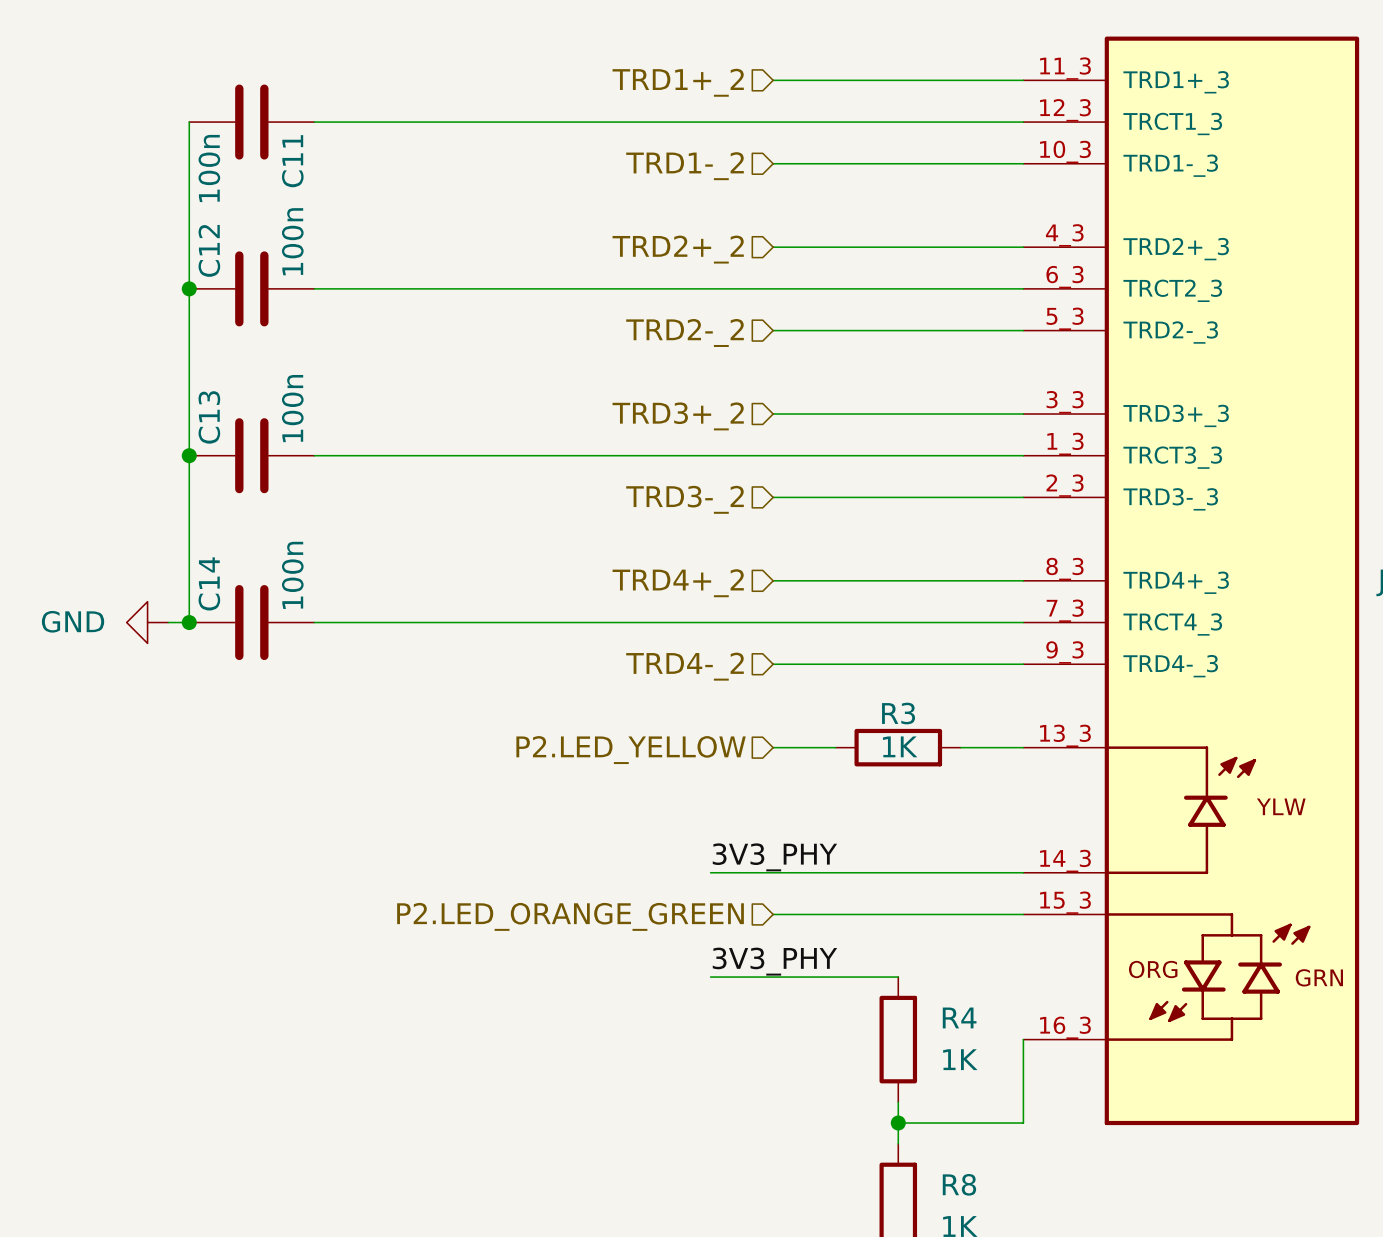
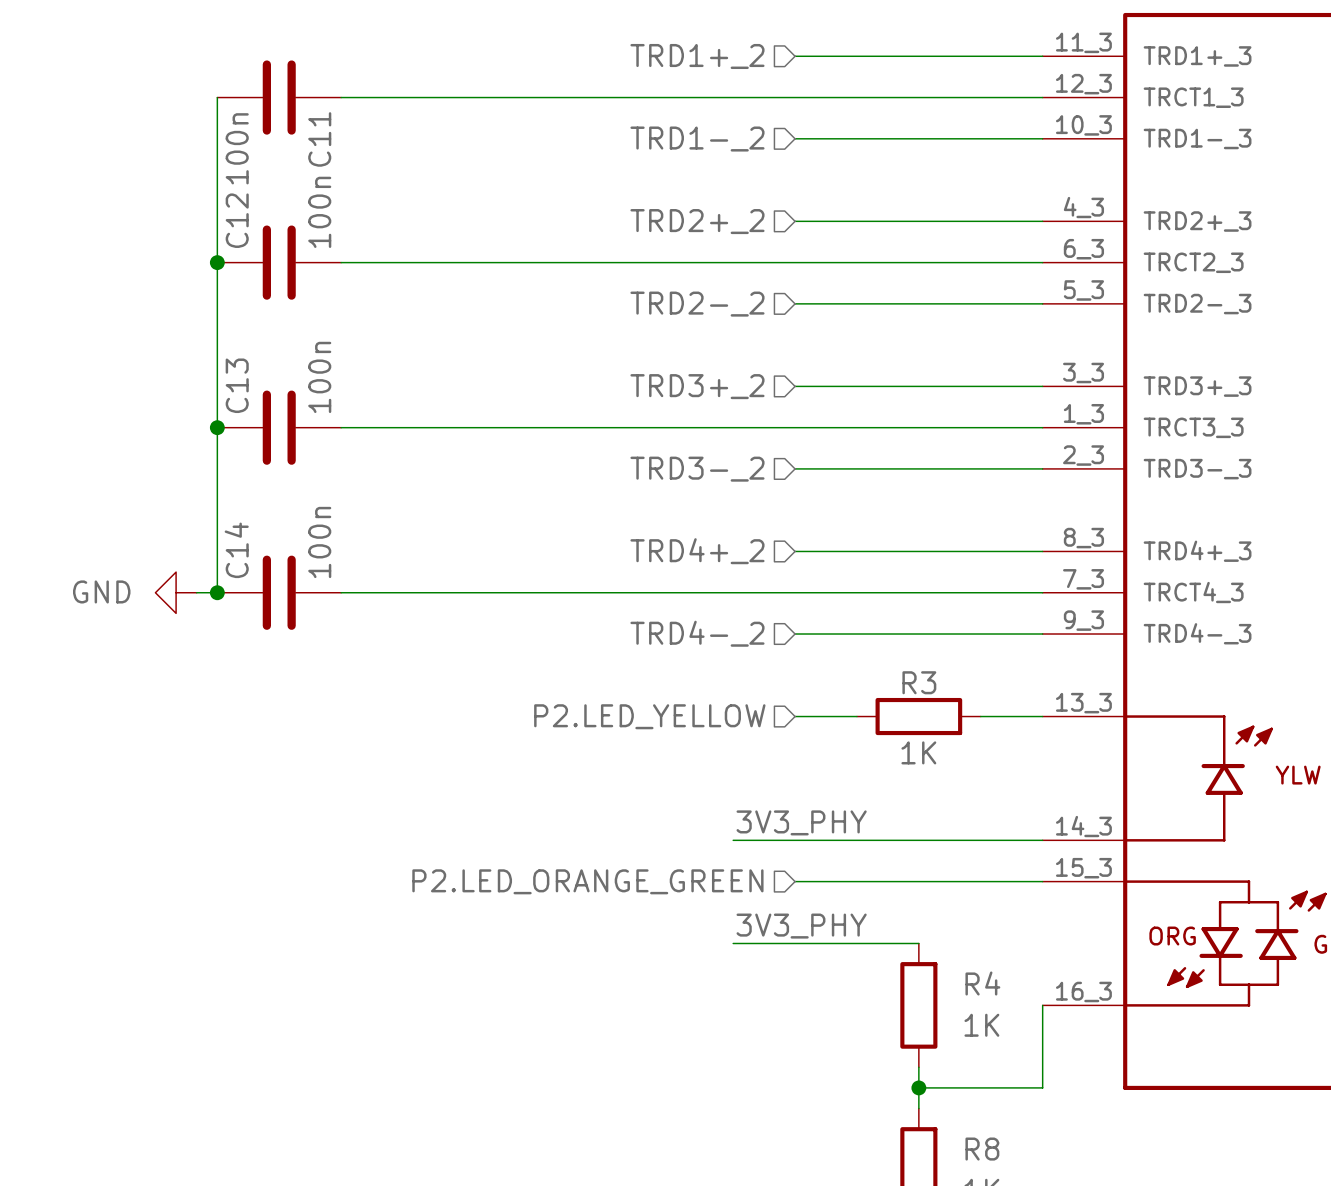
R3 value position: 1K (900, 746) -> 1K (918, 752)

